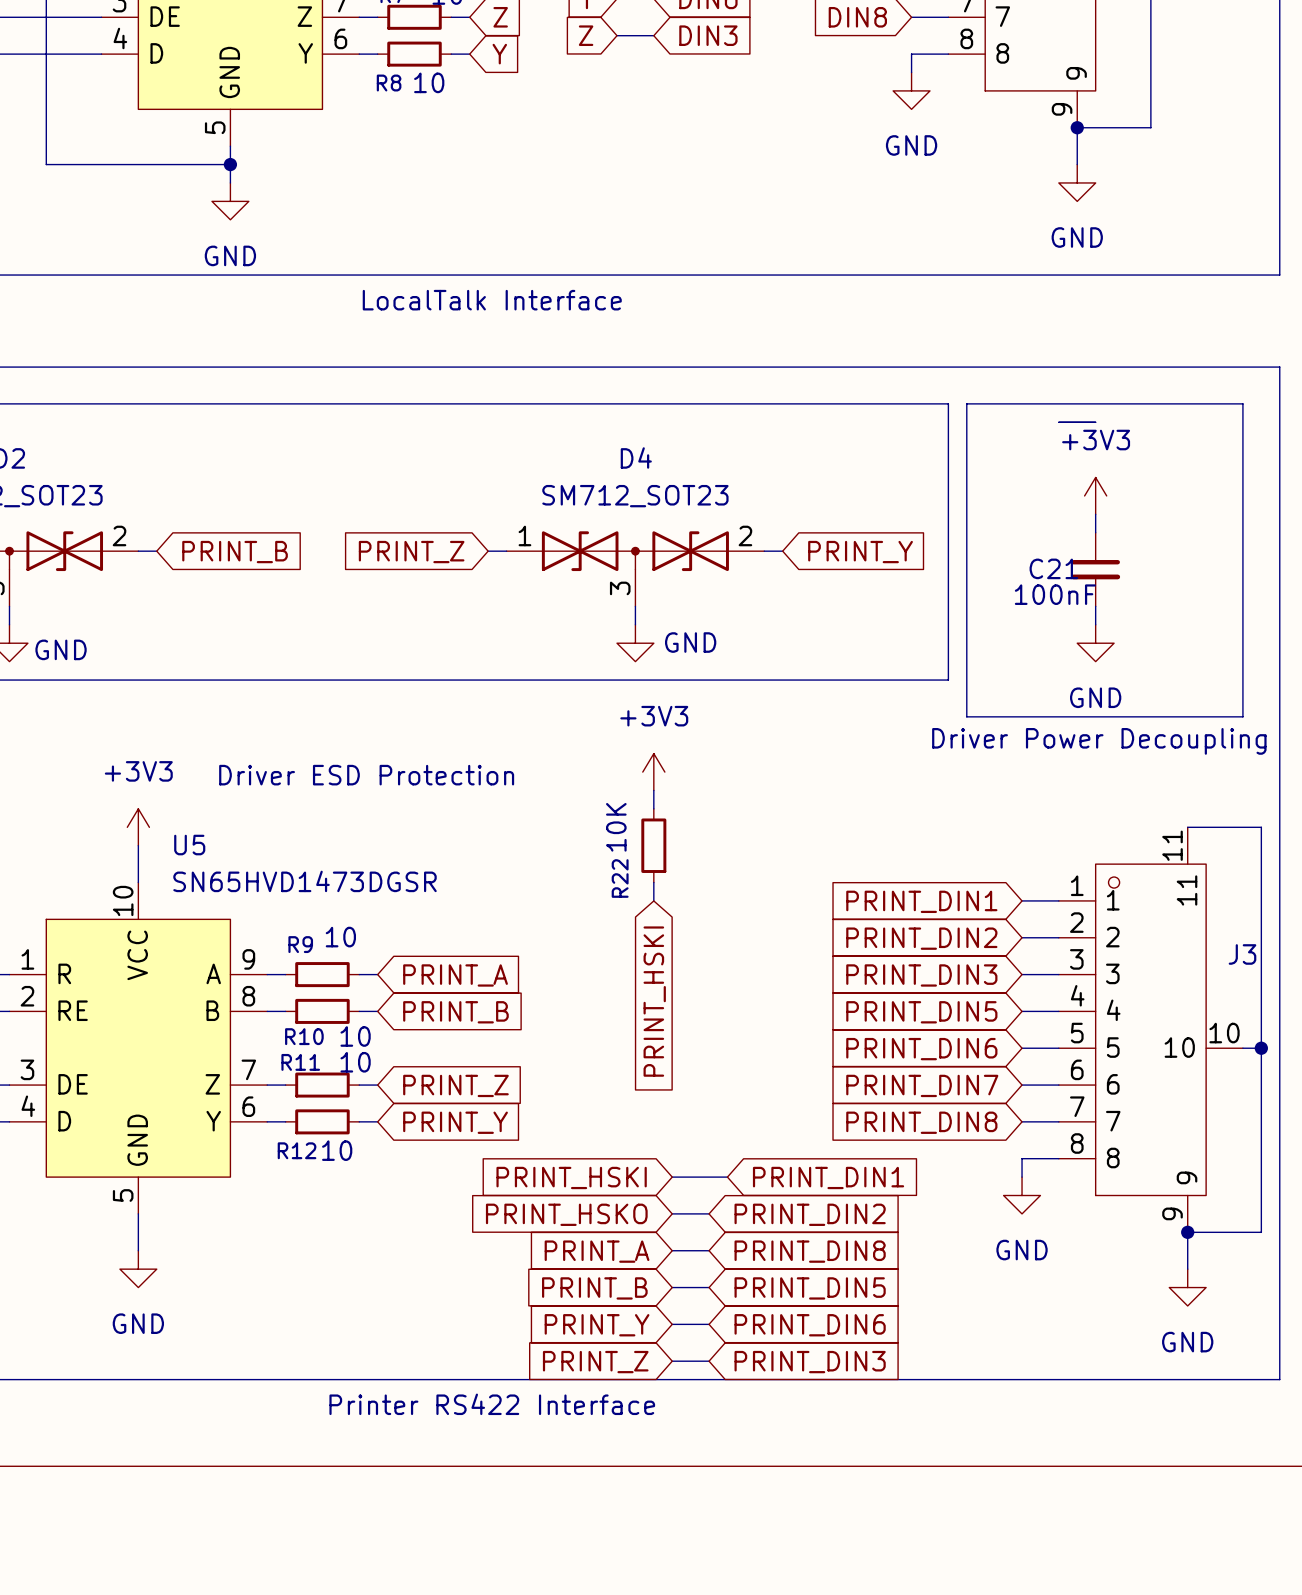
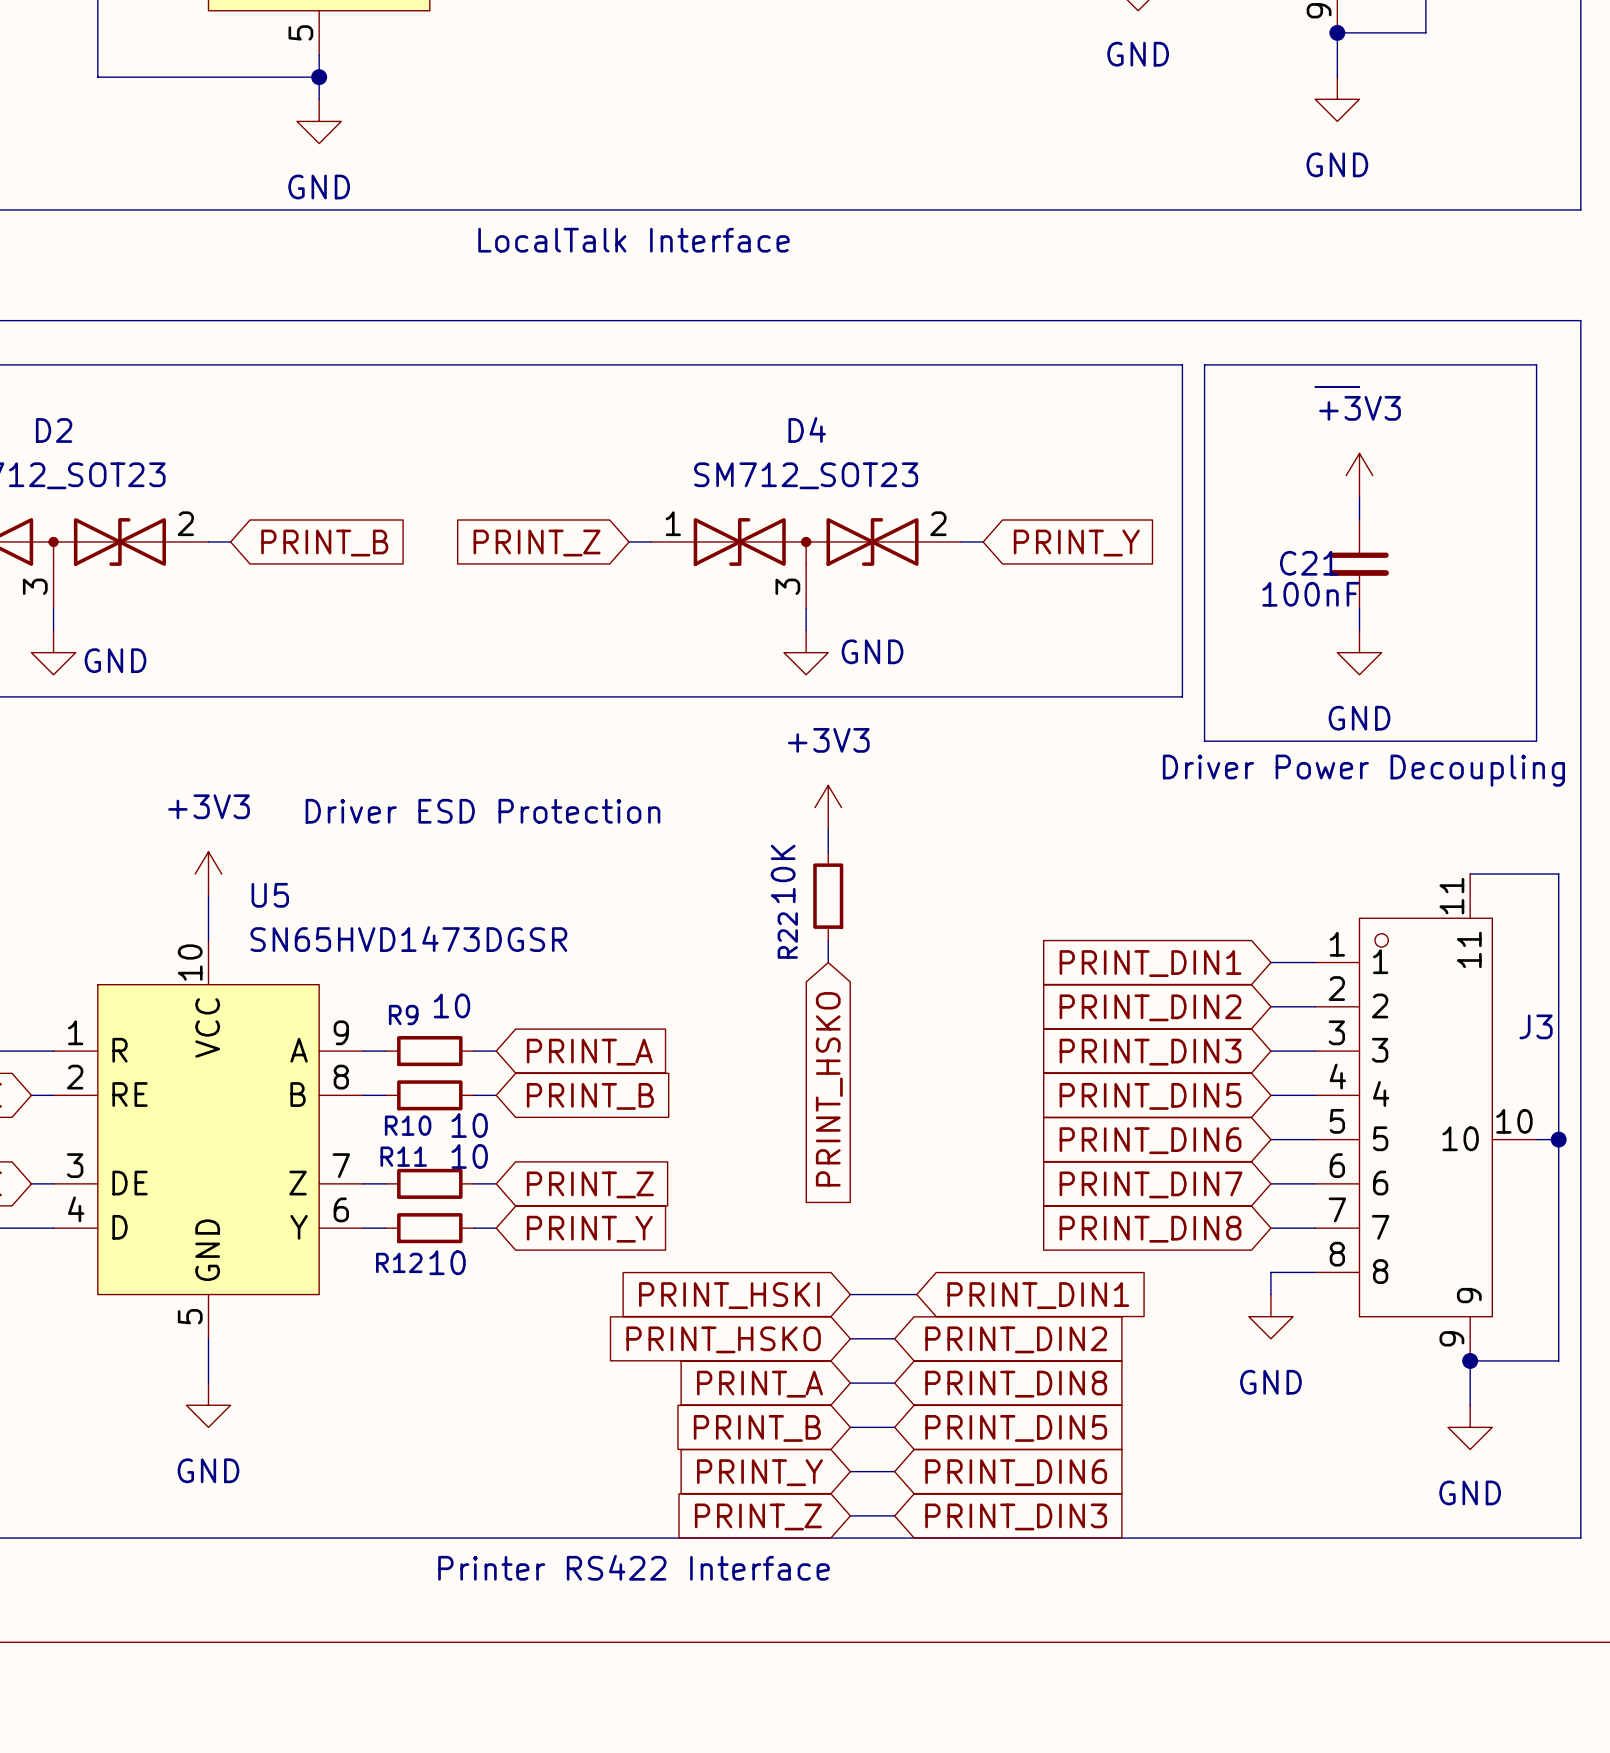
global label: PRINT_HSKI (654, 1001) -> PRINT_HSKO (829, 1089)

